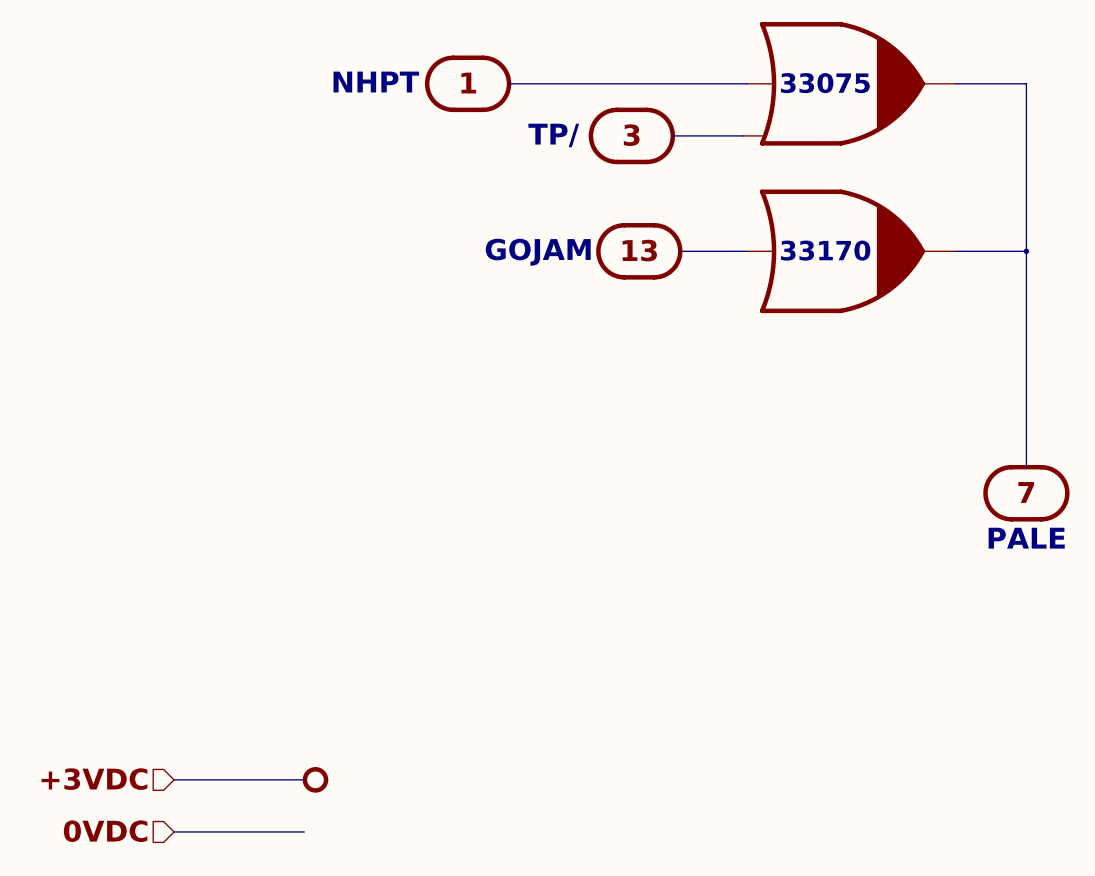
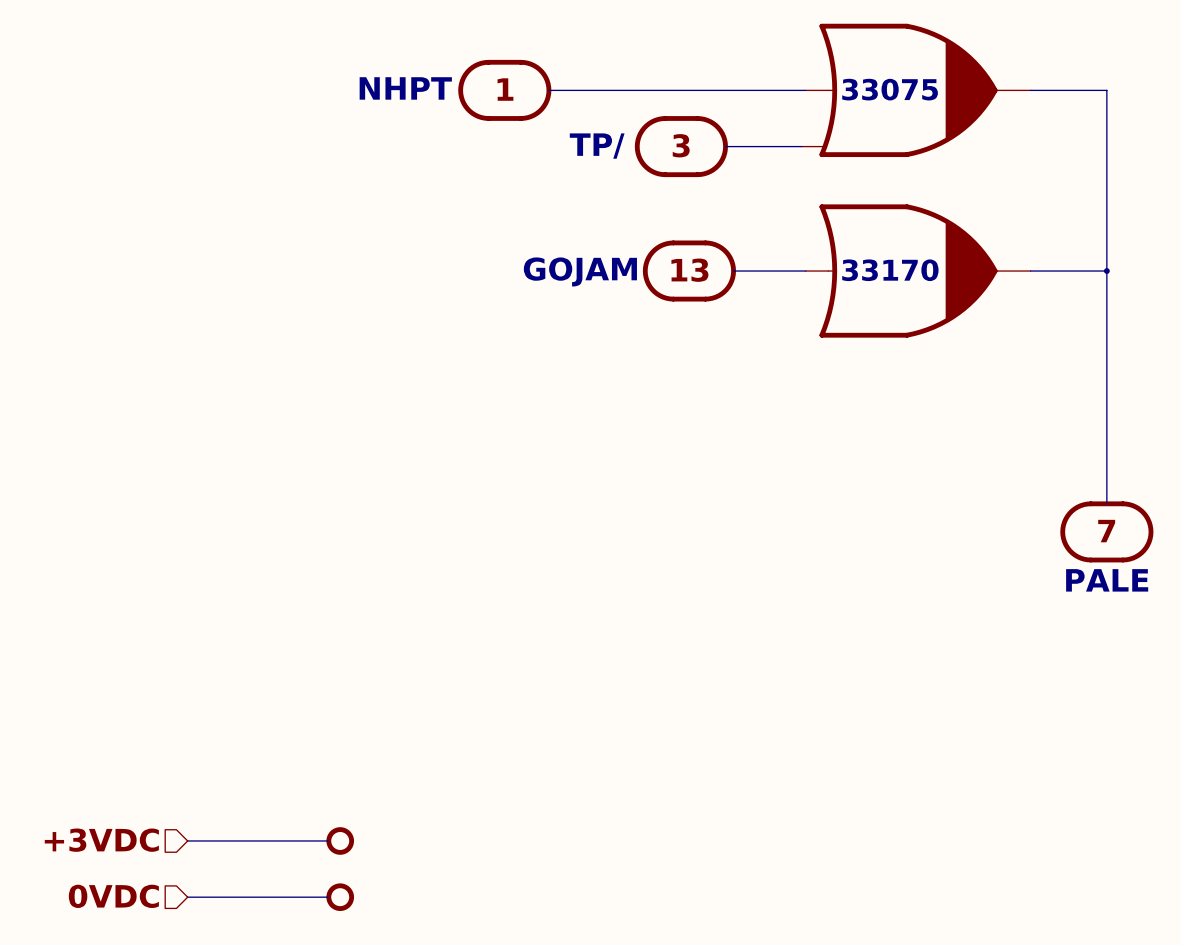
part: none -> (340, 897)

